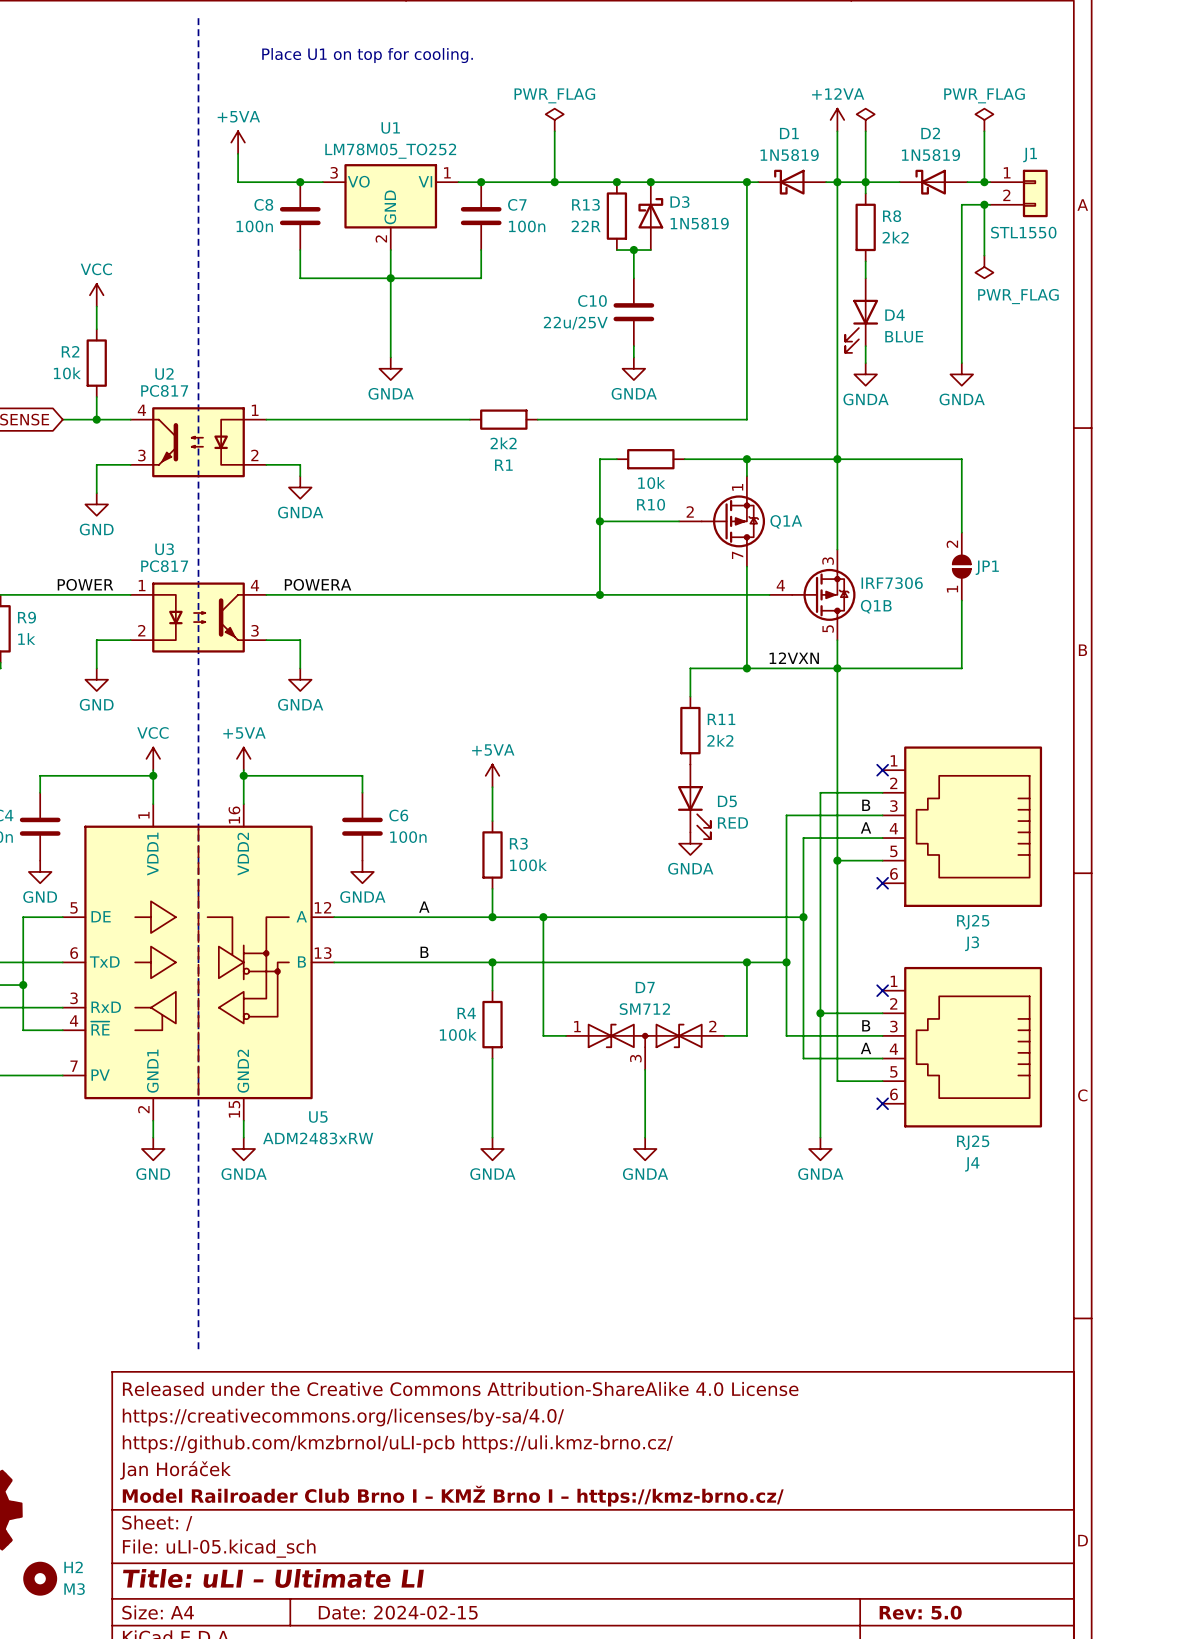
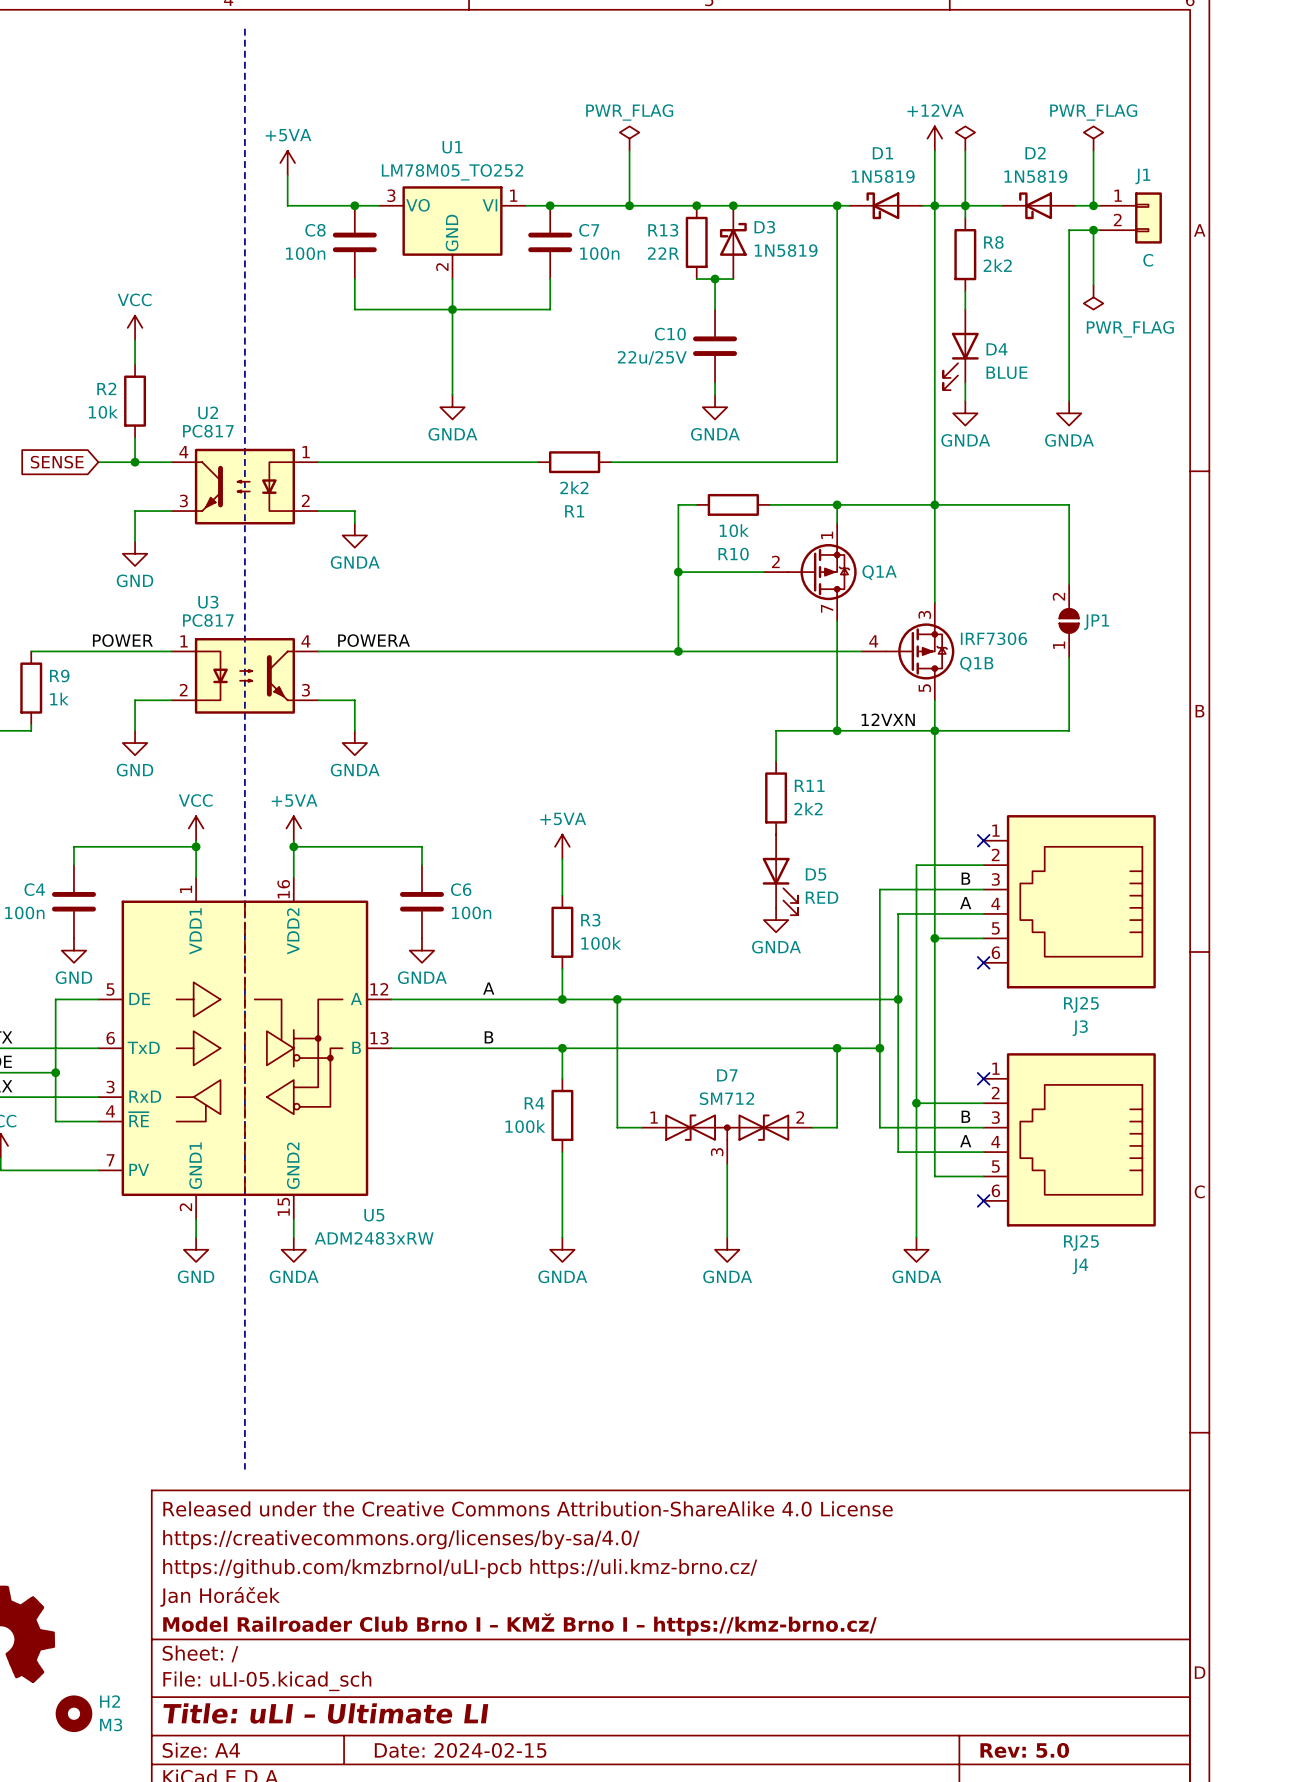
text: Place U1 on top for cooling. (367, 55) -> none
J1 value: STL1550 (1023, 232) -> C (1148, 260)

